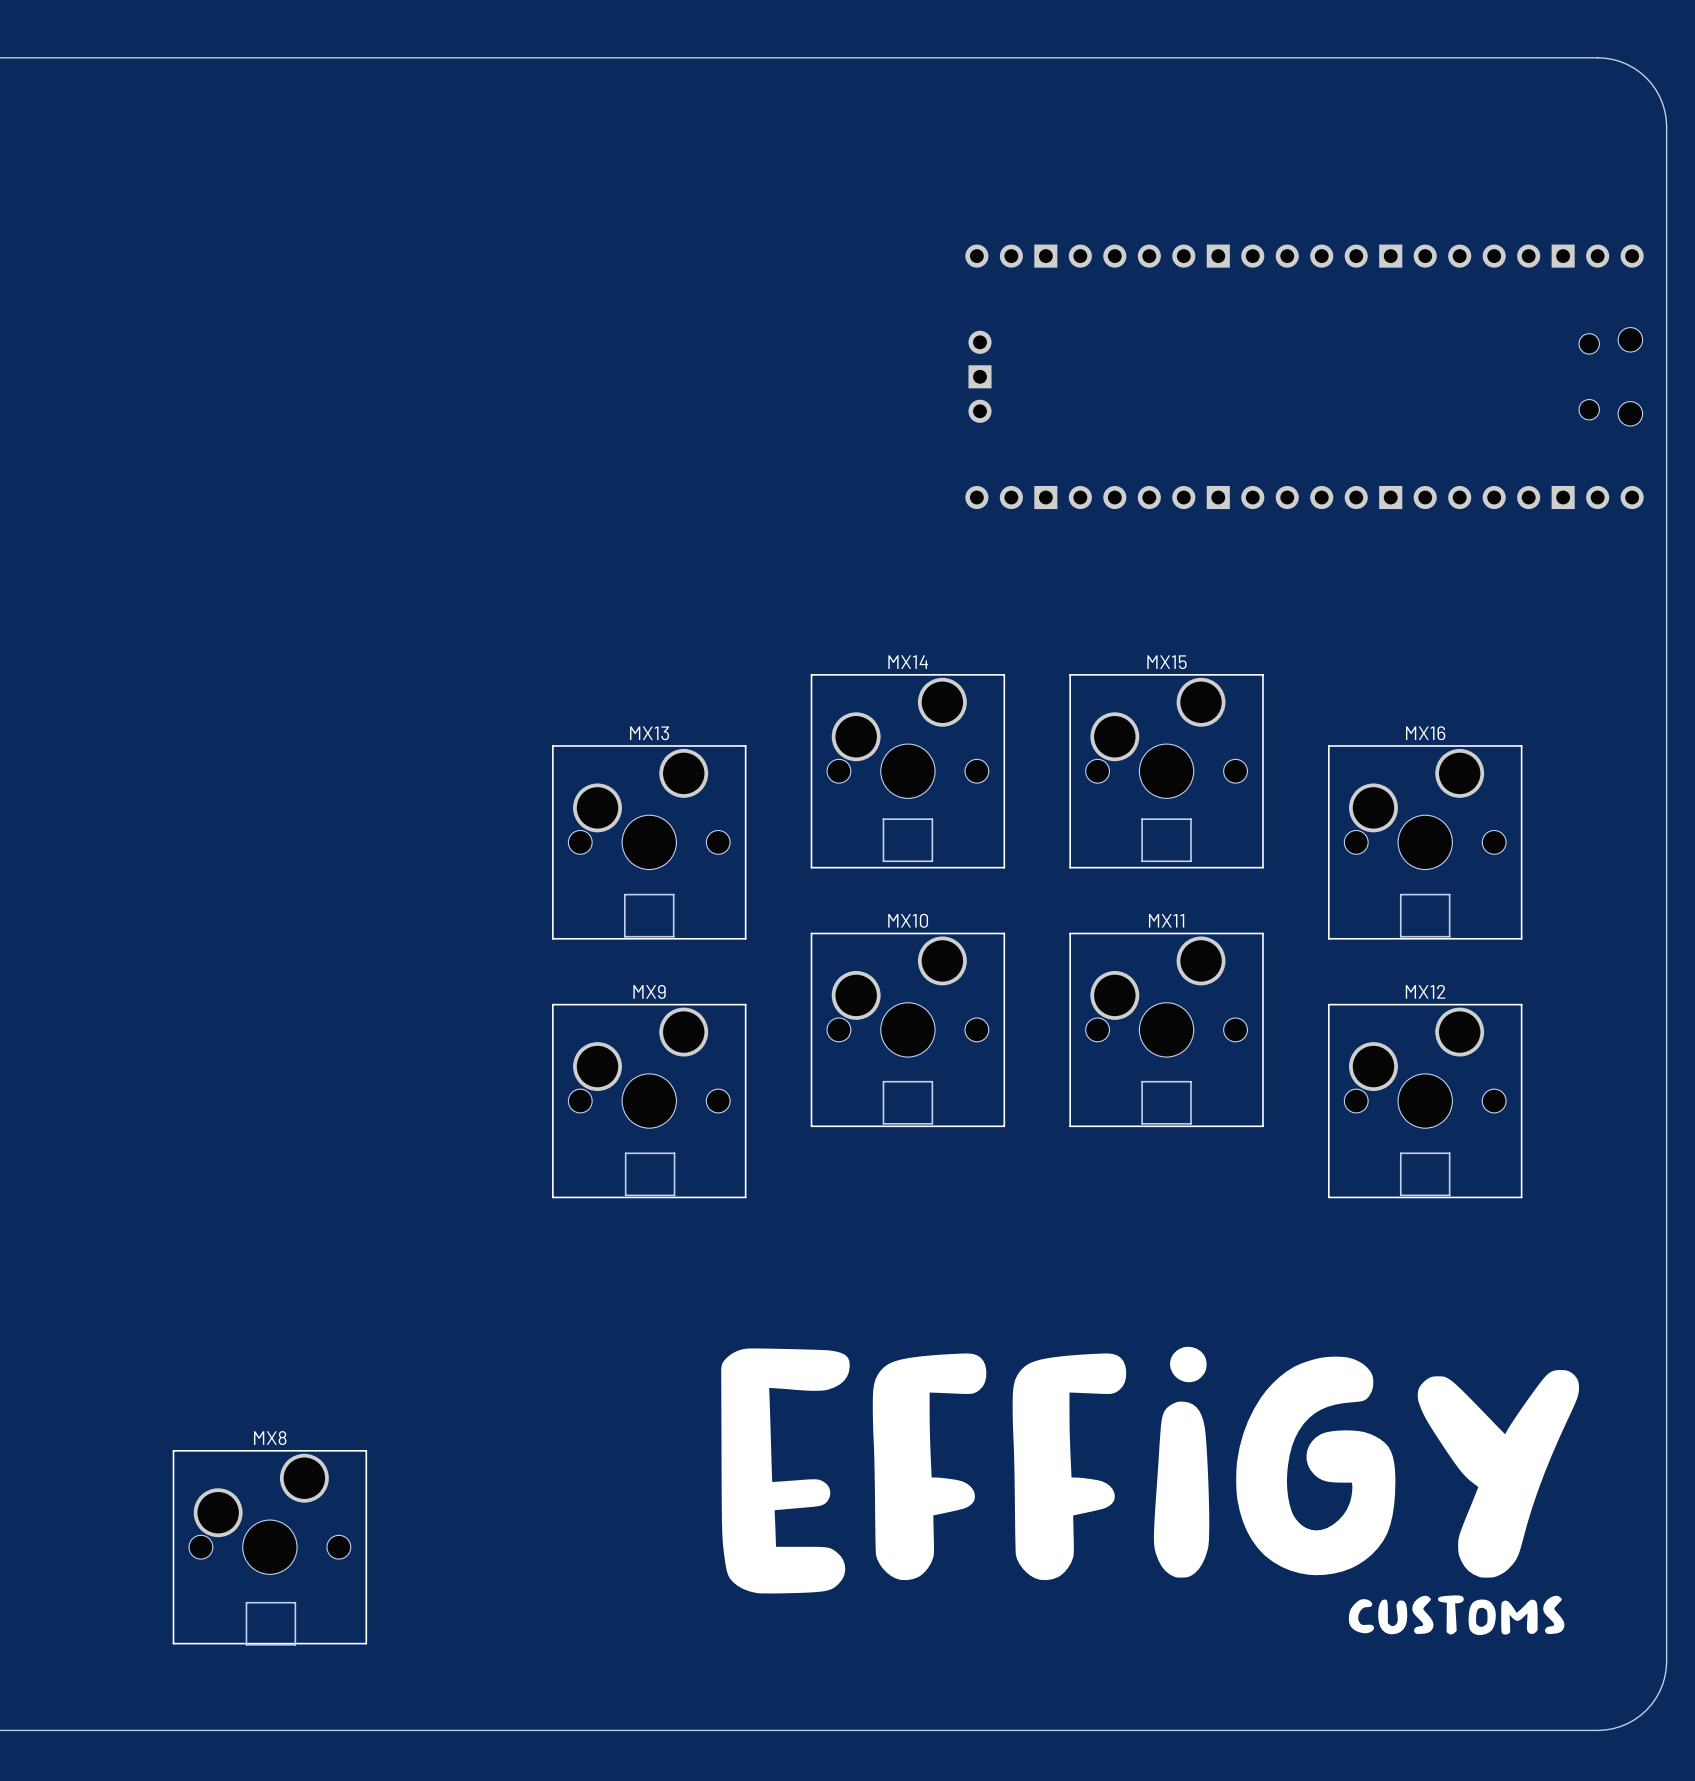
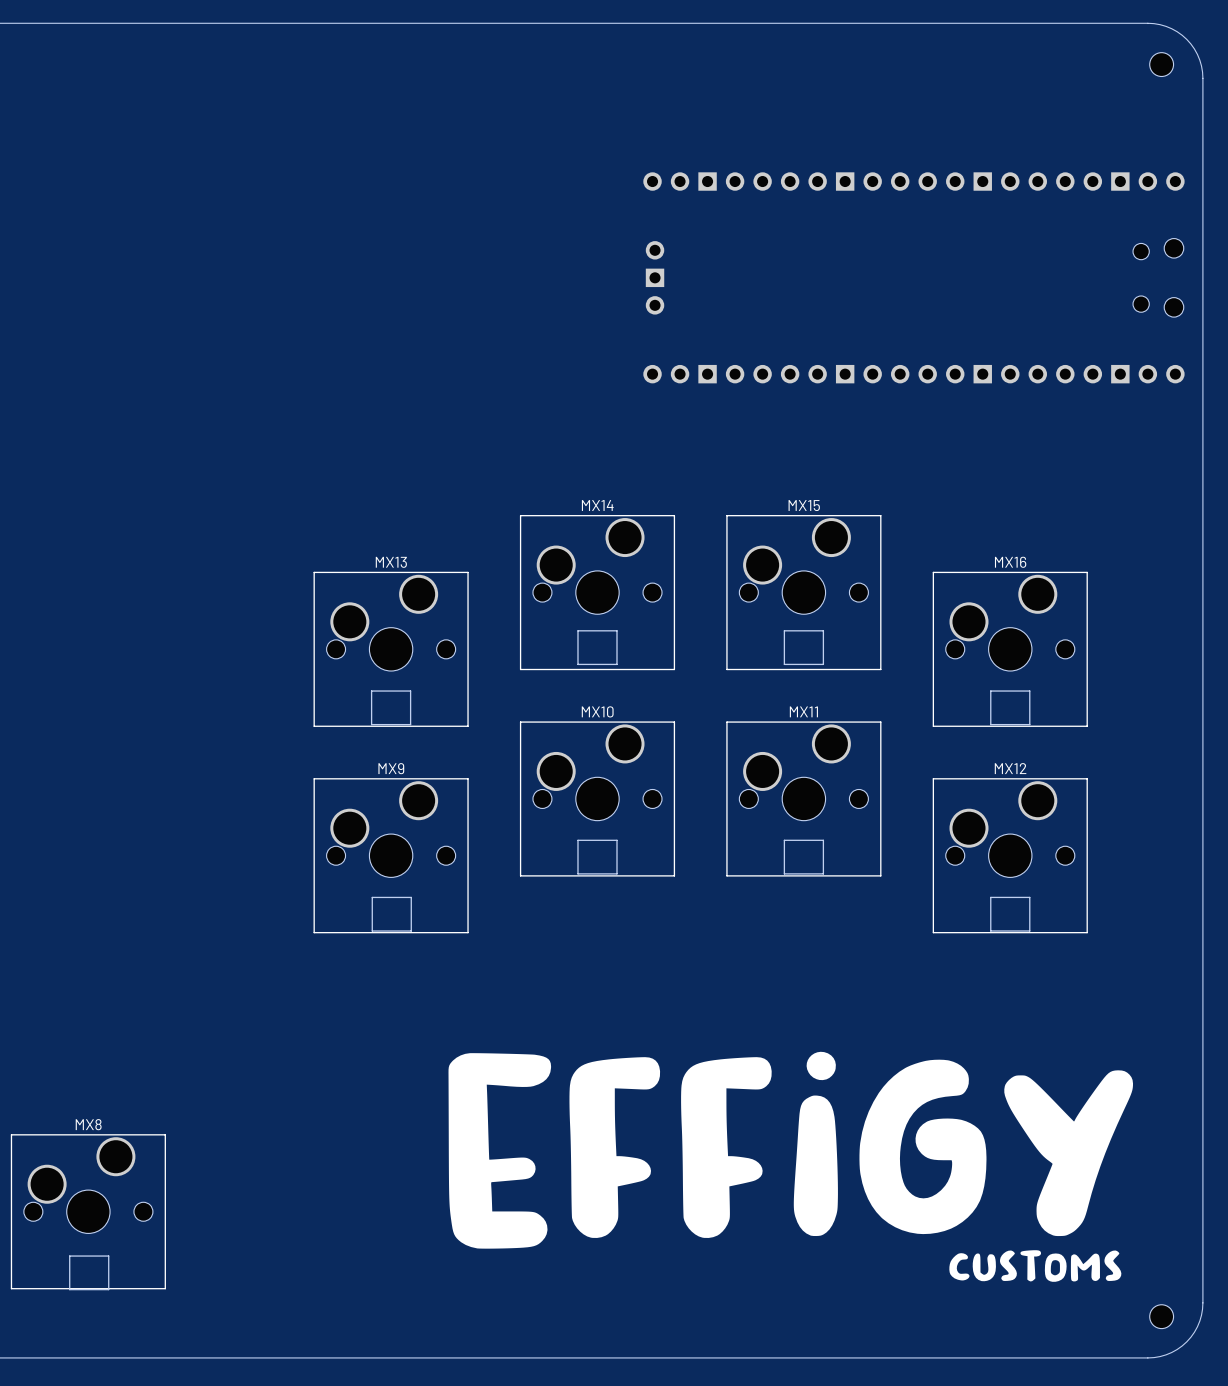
part: none -> (1161, 64)
part: none -> (1161, 1316)

